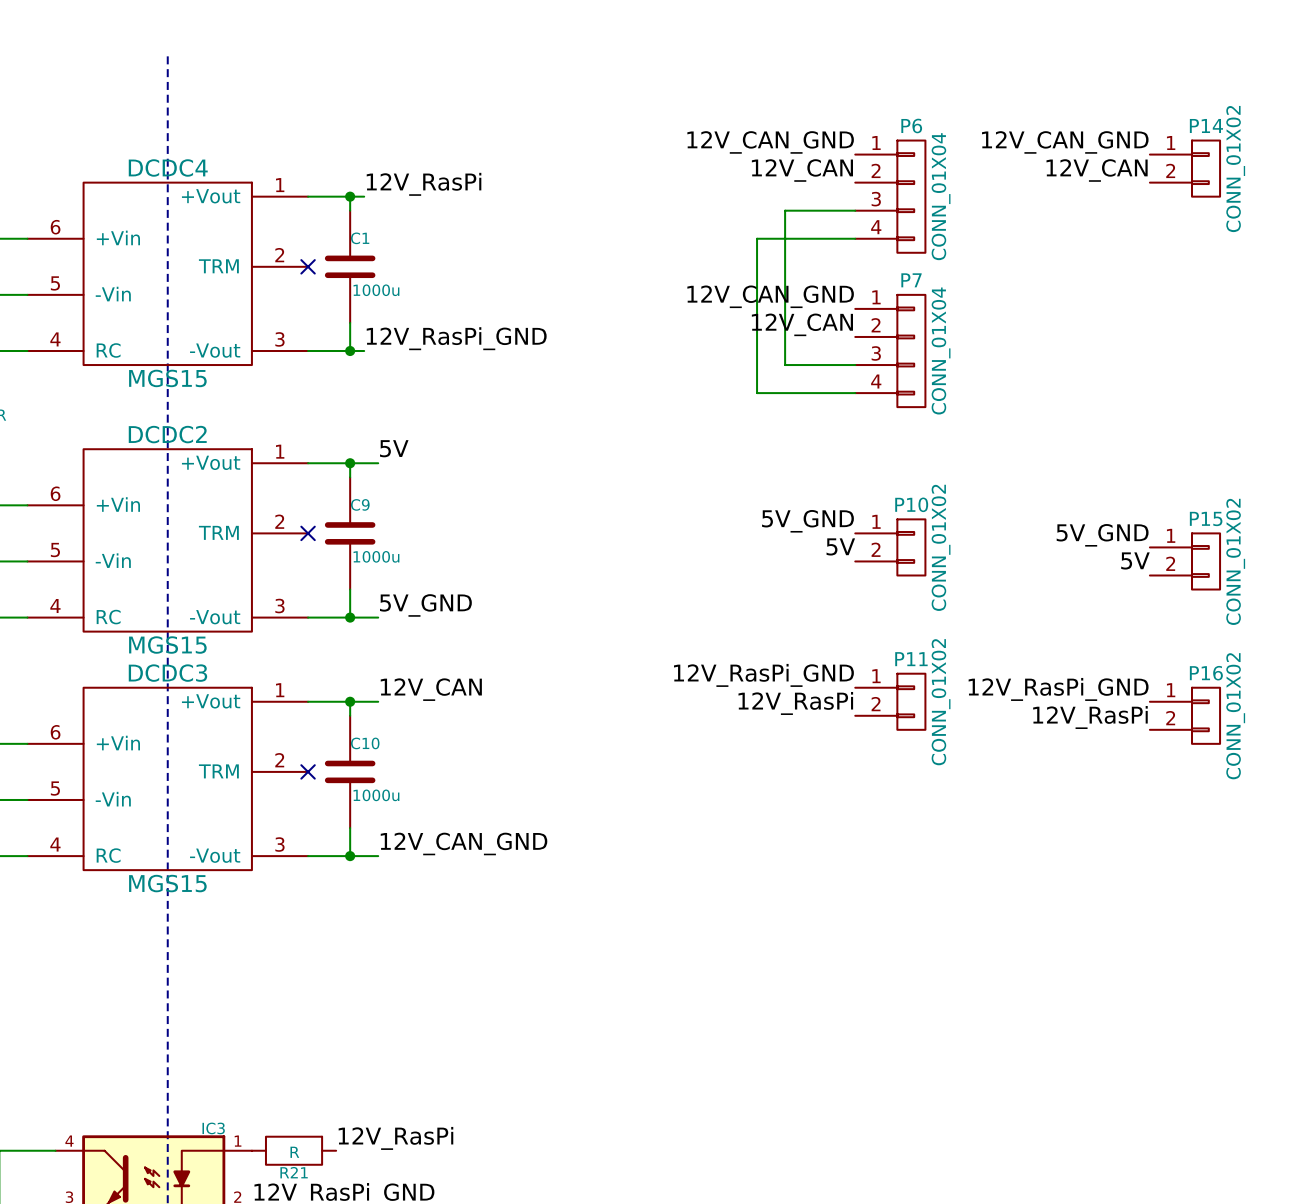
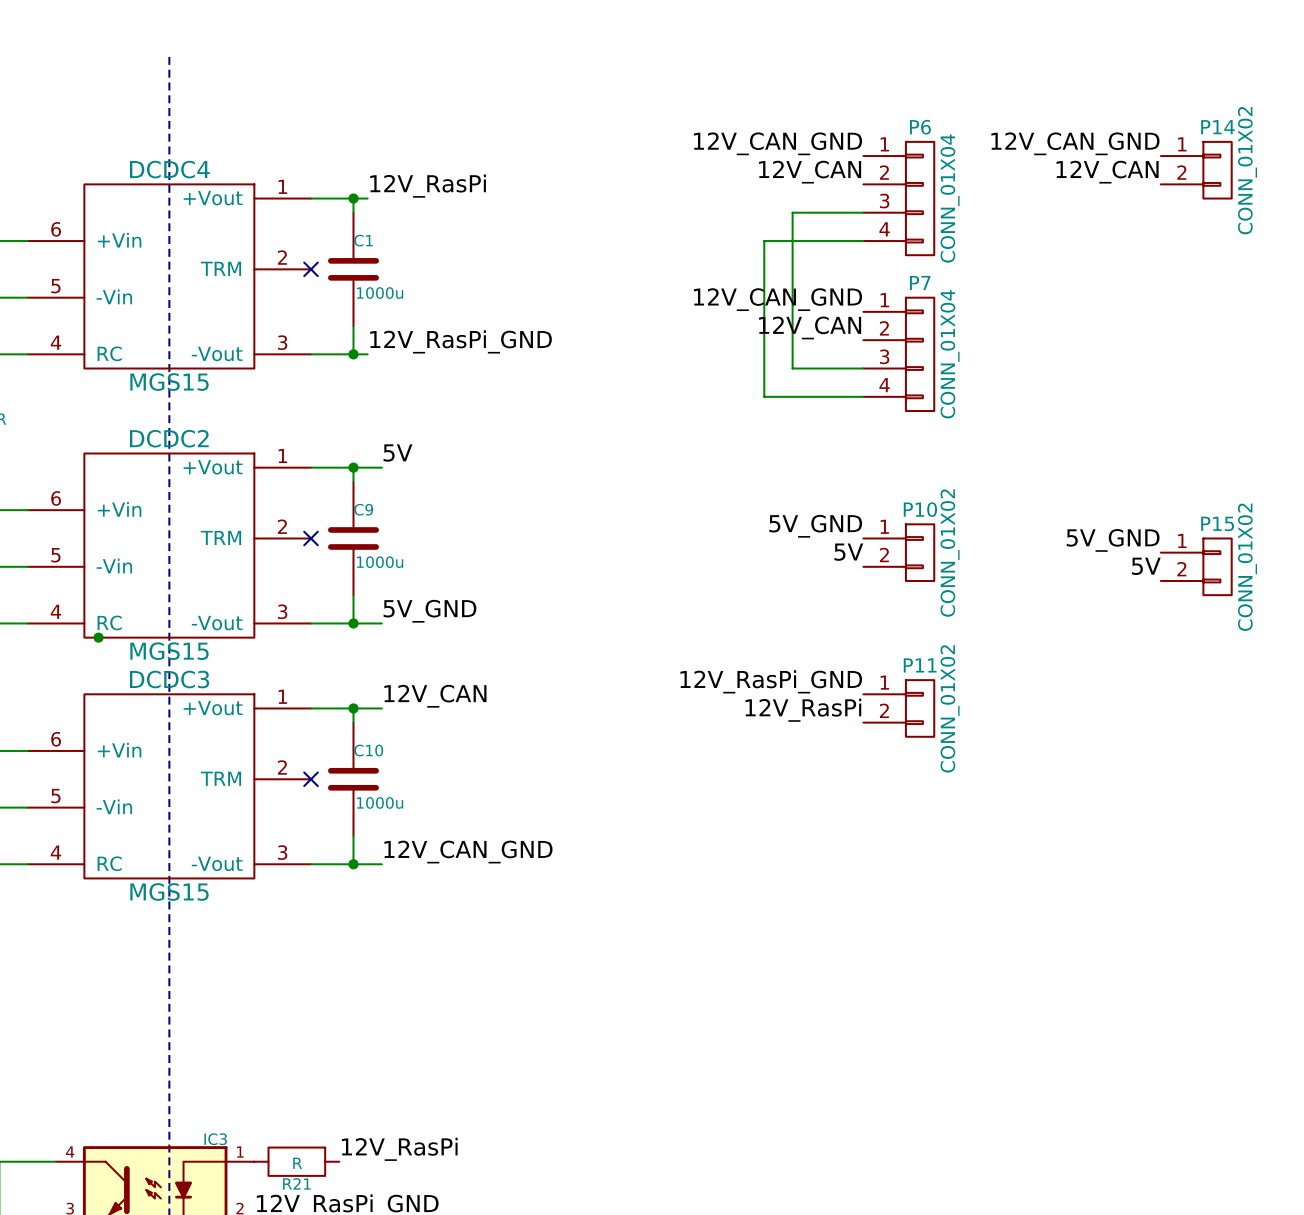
junction: none -> (98, 637)
label: 12V_RasPi_GND (1058, 689) -> none
P16: CONN_01X02 (1184, 715) -> none
label: 12V_RasPi (1090, 717) -> none

